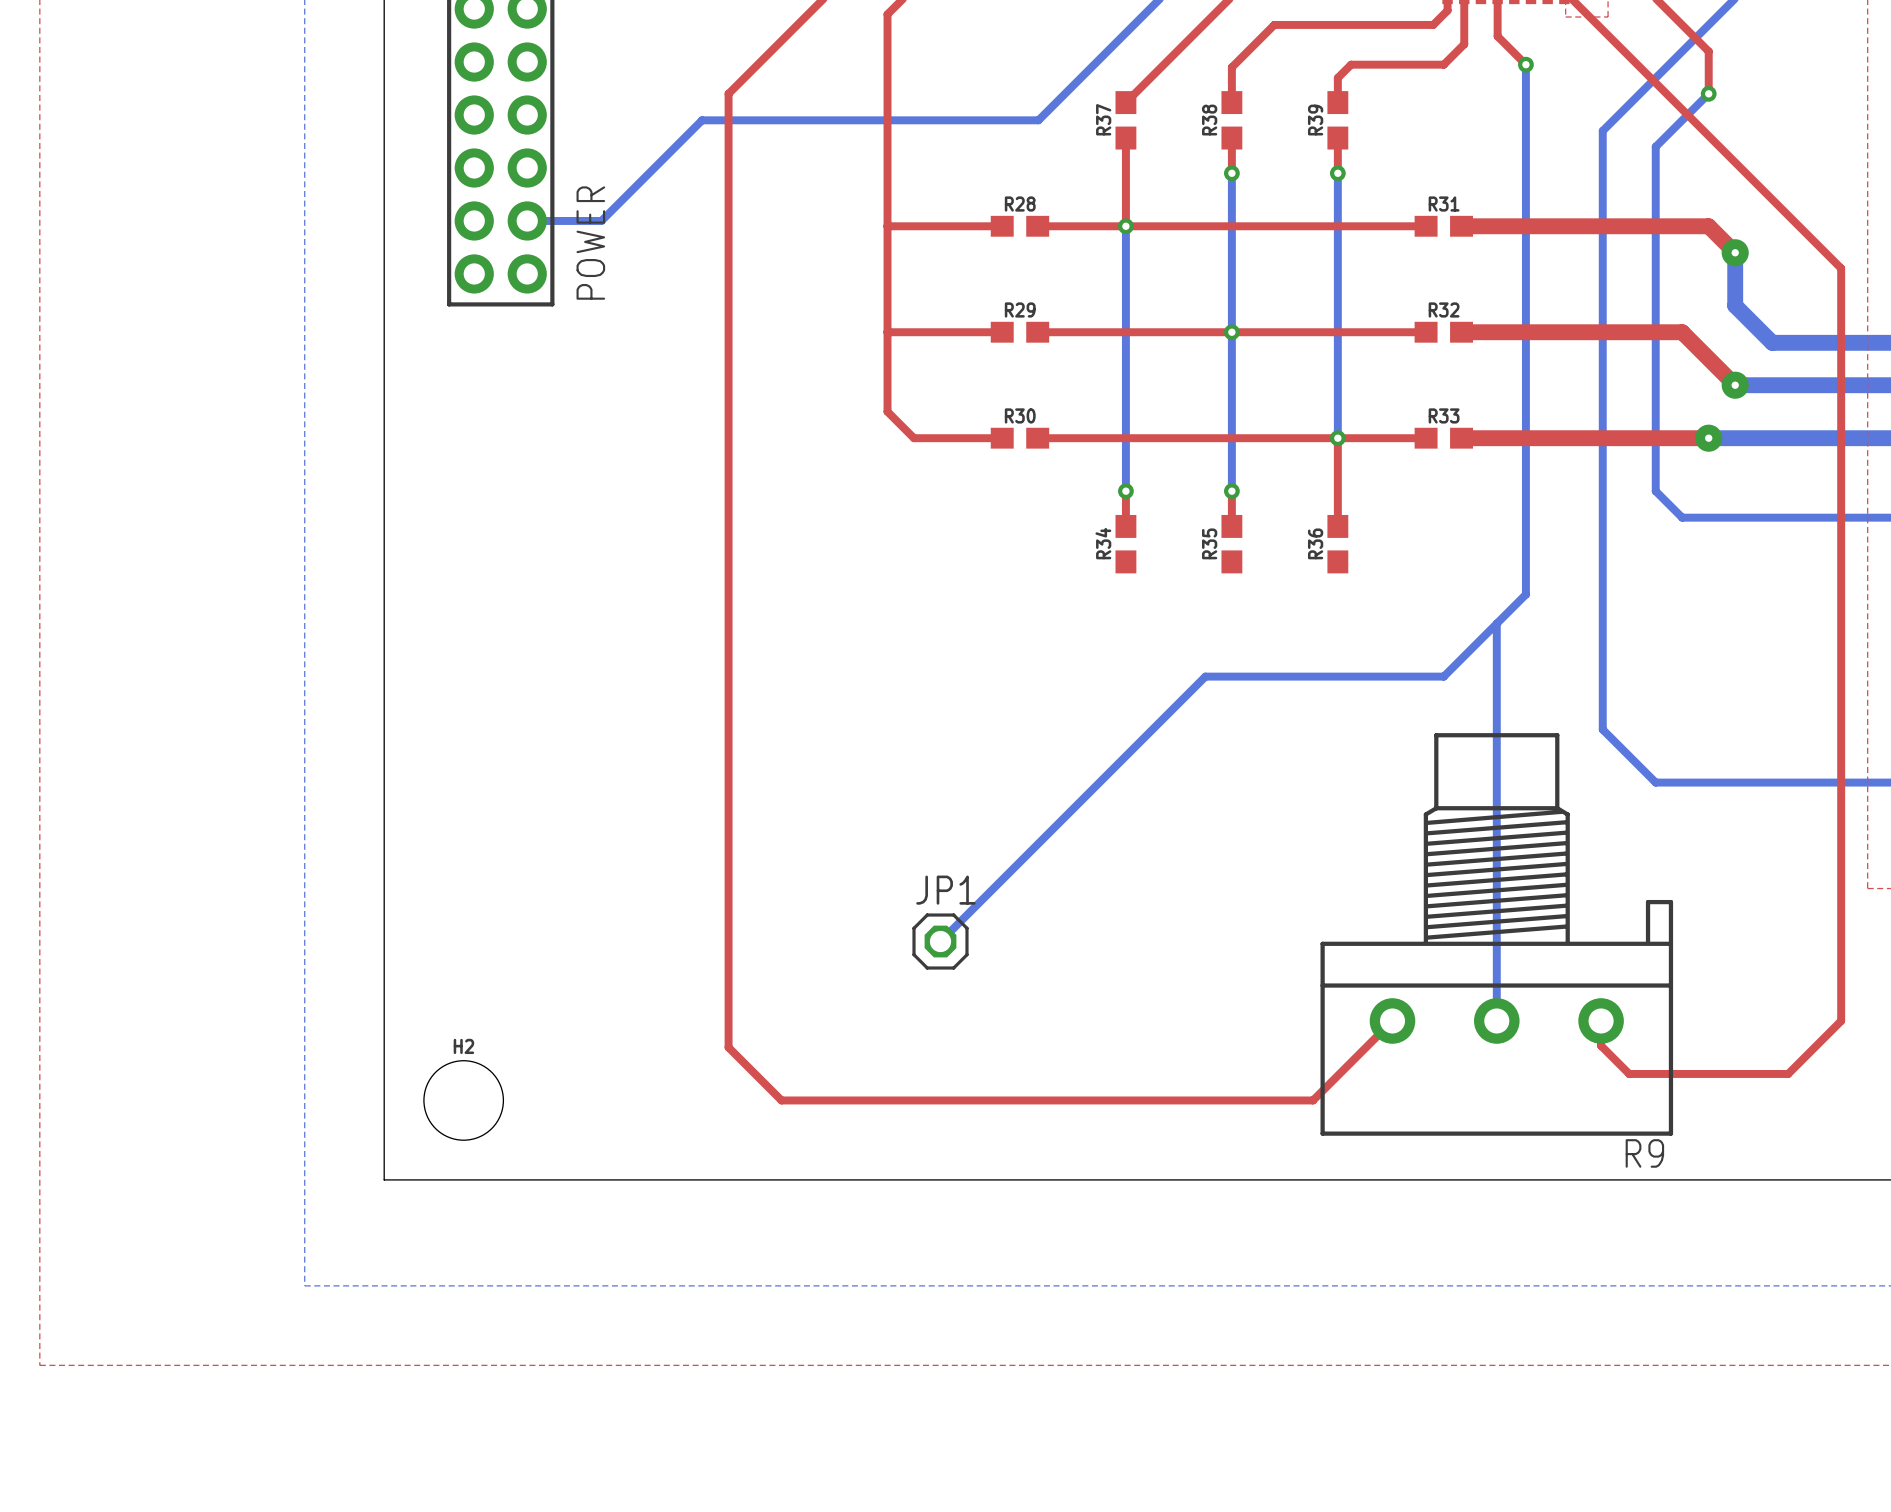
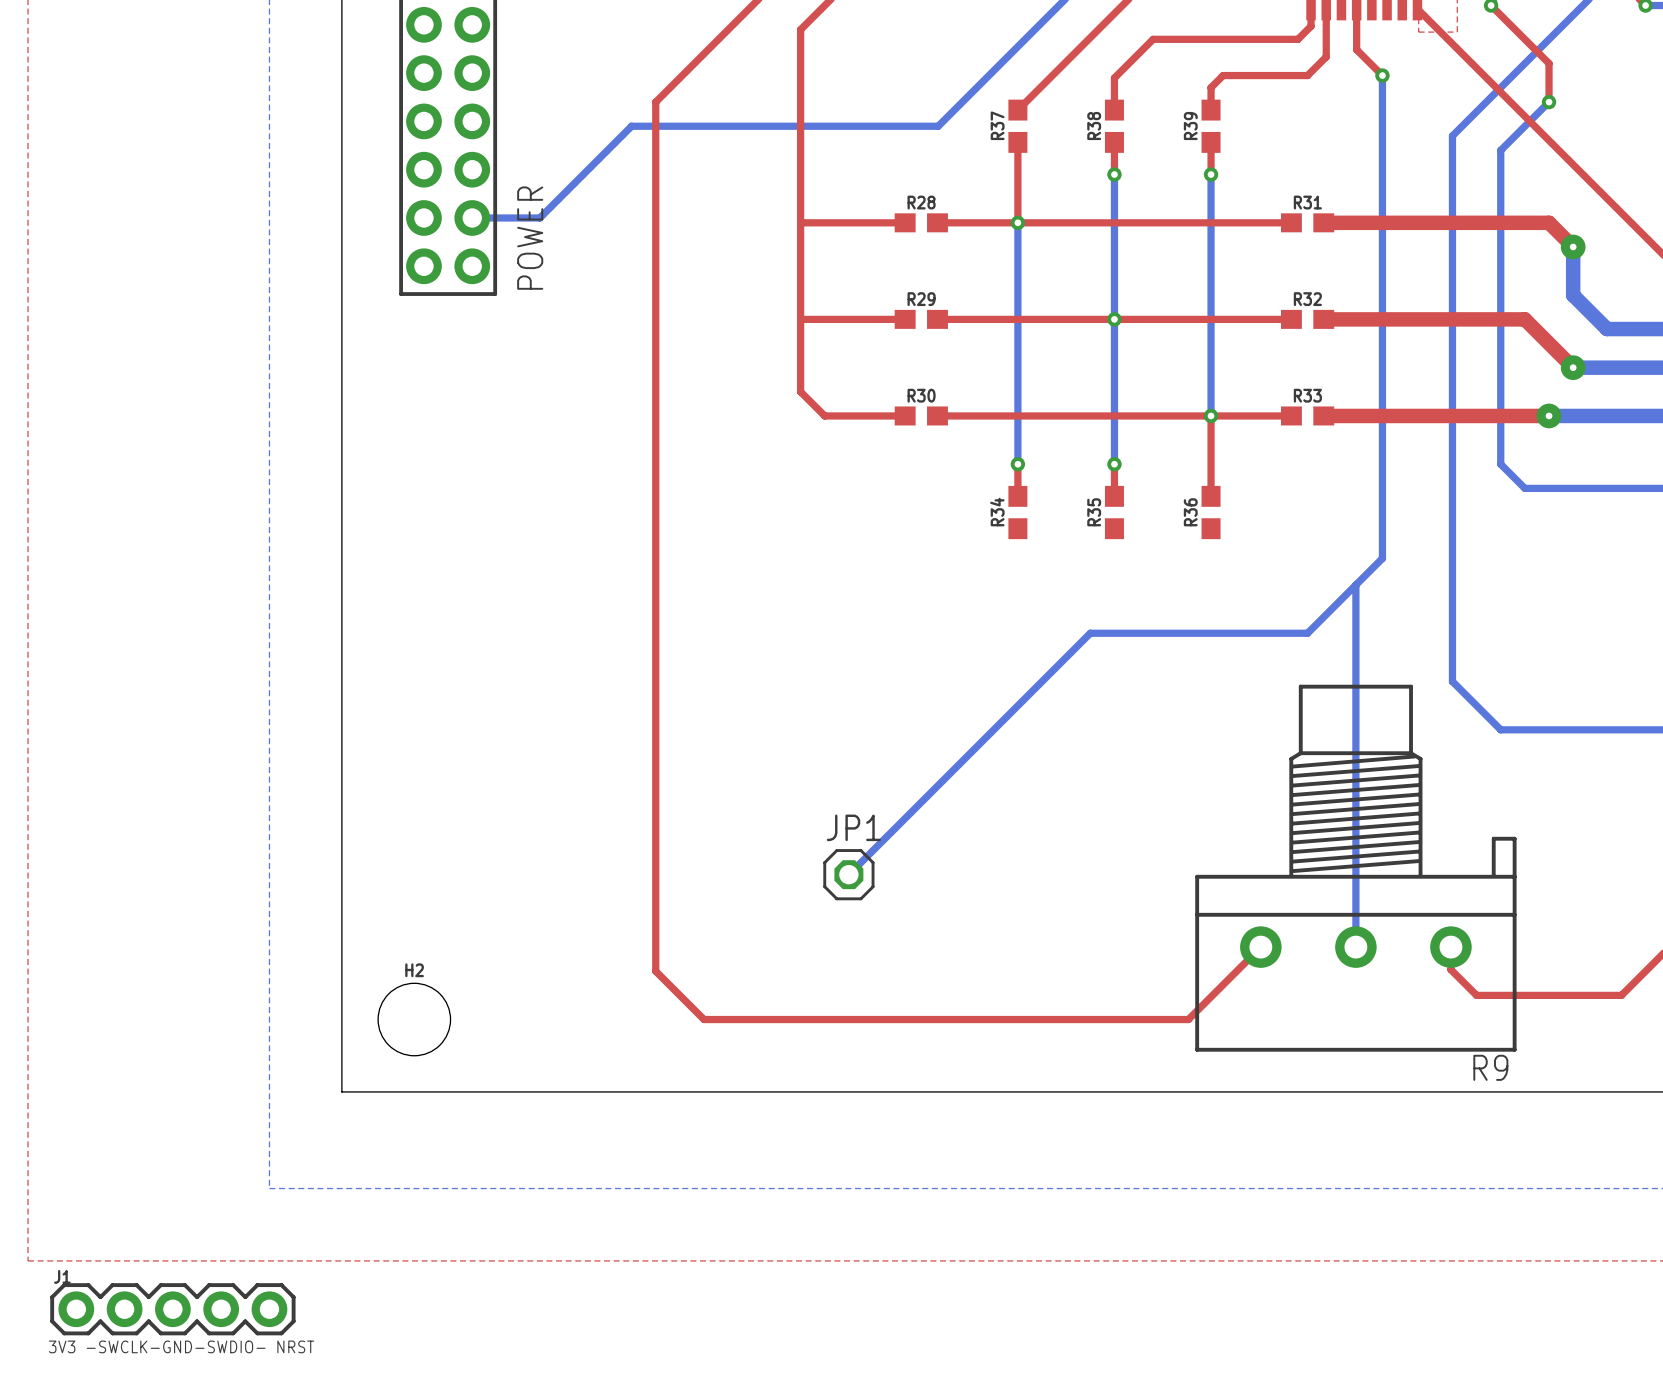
J1: none -> 3V3 -SWCLK-GND-SWDIO- NRST (172, 1309)

